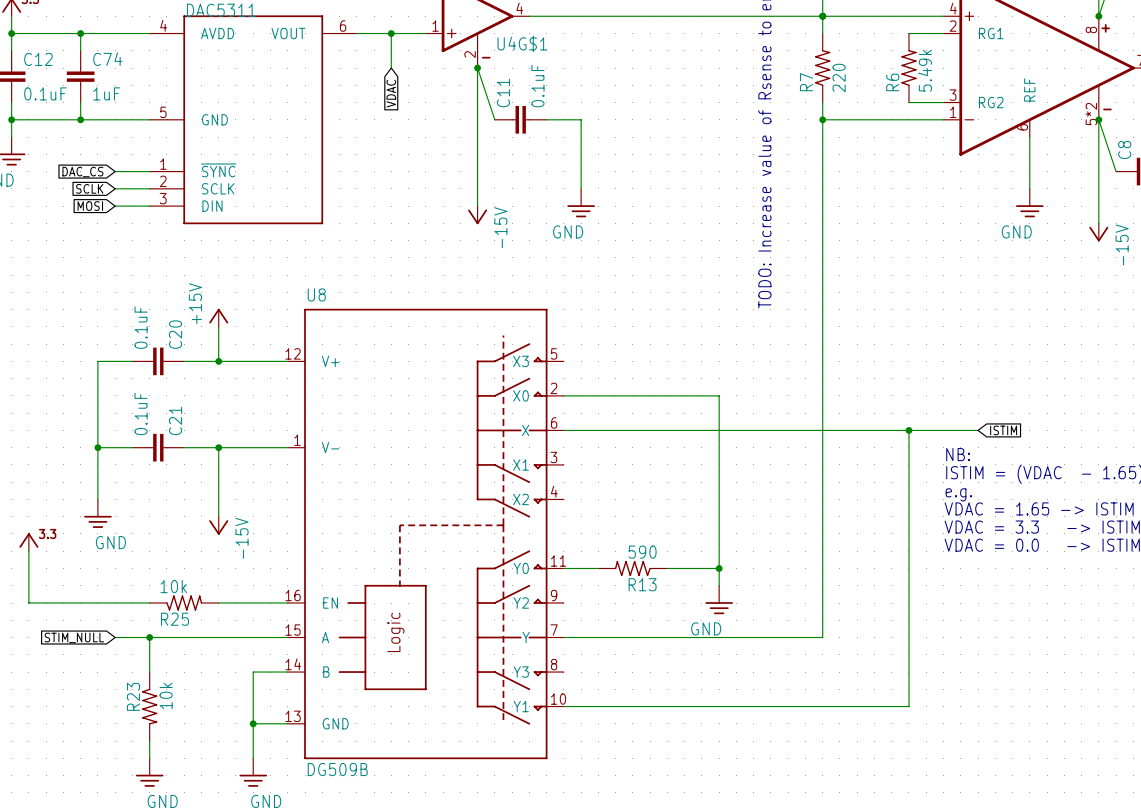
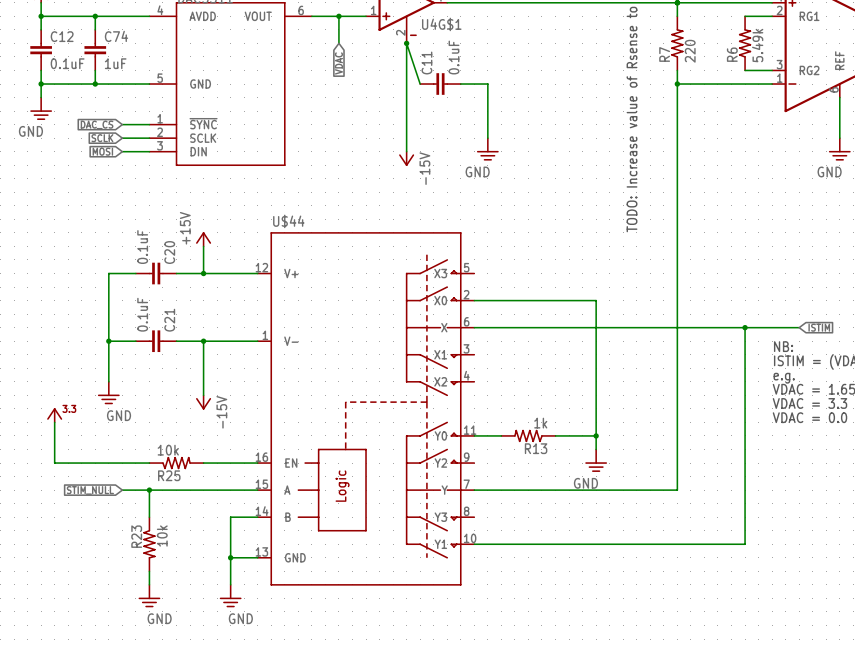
U8 name: U8 (316, 294) -> U$44 (288, 221)
R13 value: 590 (642, 552) -> 1k (540, 423)
U8 value: DG509B (337, 769) -> none

